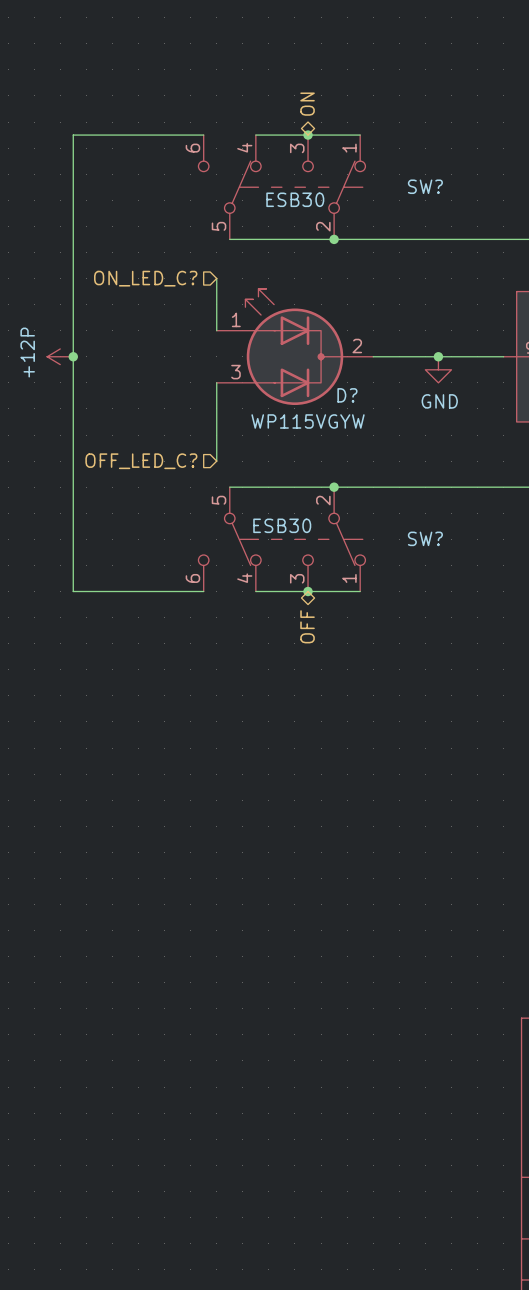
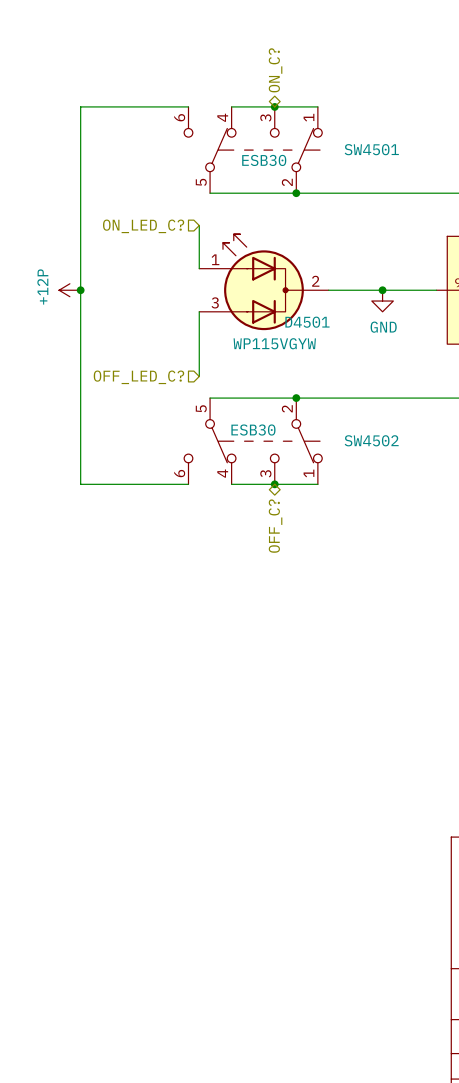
hierarchical label: ON (307, 104) -> ON_C? (275, 70)
SW? name: SW? (425, 186) -> SW4501 (371, 149)
D? name: D? (347, 395) -> D4501 (307, 322)
SW? name: SW? (425, 538) -> SW4502 (371, 440)
hierarchical label: OFF (307, 626) -> OFF_C? (275, 526)

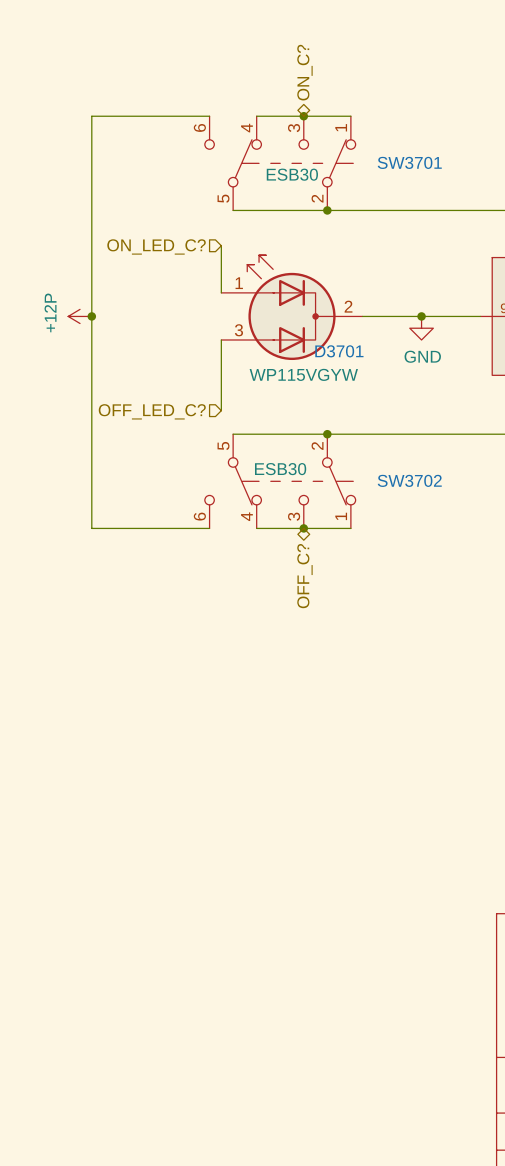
SW4501 name: SW4501 (371, 149) -> SW3701 (409, 162)
D4501 name: D4501 (307, 322) -> D3701 (339, 351)
SW4502 name: SW4502 (371, 440) -> SW3702 (409, 480)

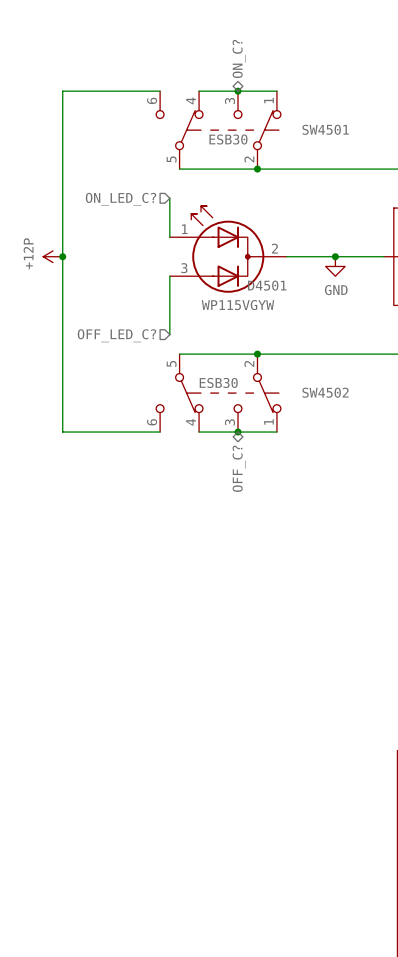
SW3701 name: SW3701 (409, 162) -> SW4501 (325, 129)
D3701 name: D3701 (339, 351) -> D4501 (267, 285)
SW3702 name: SW3702 (409, 480) -> SW4502 (325, 392)

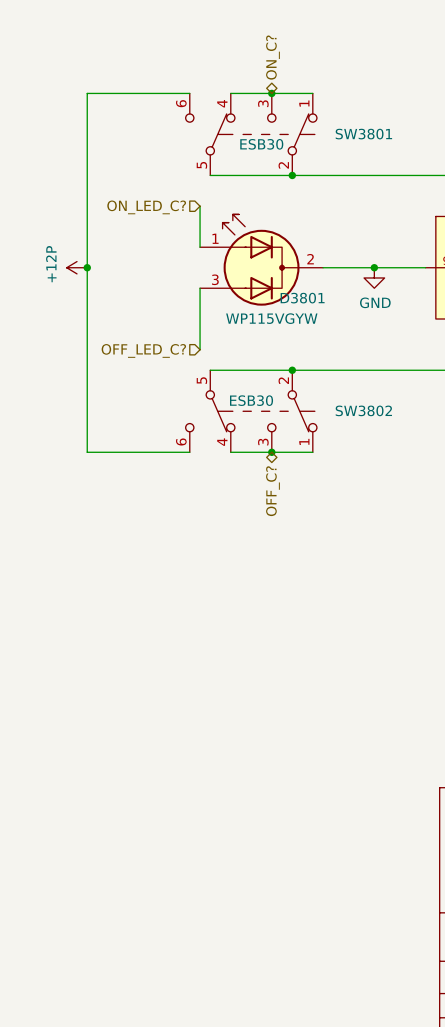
SW4501 name: SW4501 (325, 129) -> SW3801 (363, 134)
D4501 name: D4501 (267, 285) -> D3801 (302, 298)
SW4502 name: SW4502 (325, 392) -> SW3802 (363, 410)

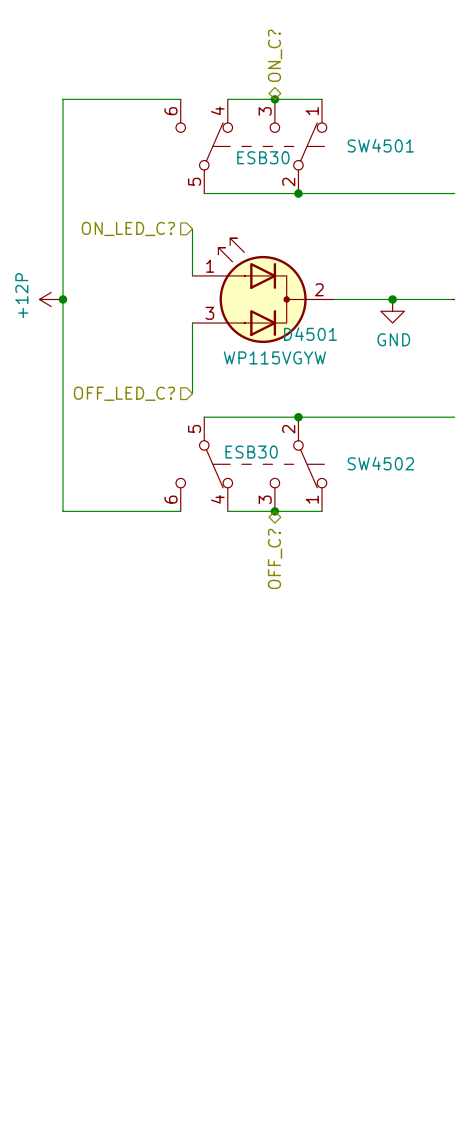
SW3801 name: SW3801 (363, 134) -> SW4501 (380, 145)
D3801 name: D3801 (302, 298) -> D4501 (310, 334)
SW3802 name: SW3802 (363, 410) -> SW4502 (380, 463)

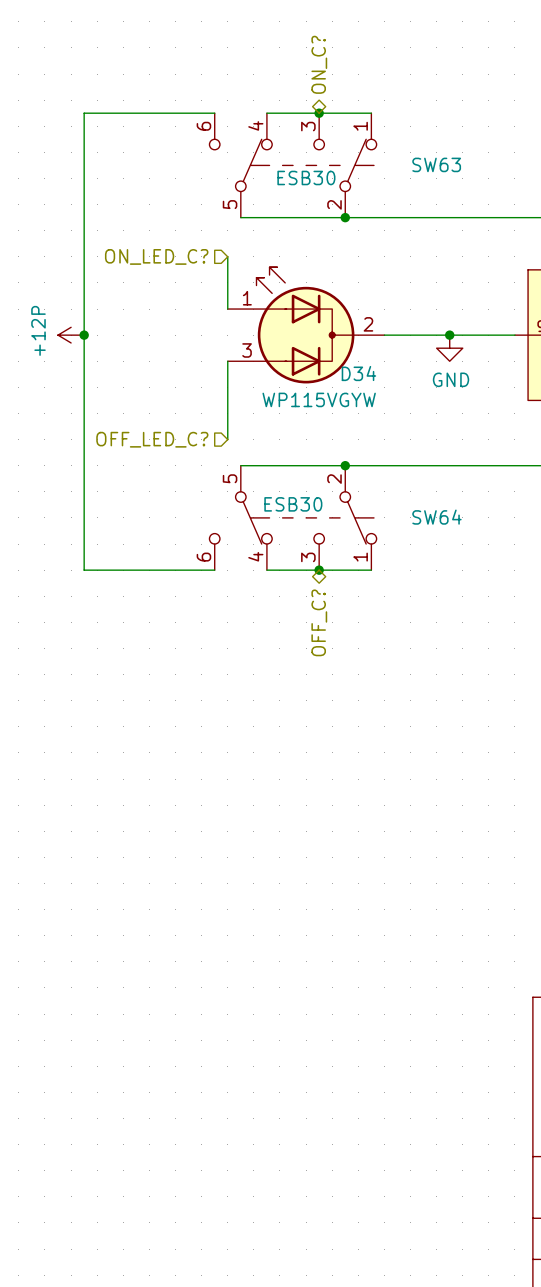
SW4501 name: SW4501 (380, 145) -> SW63 (436, 164)
D4501 name: D4501 (310, 334) -> D34 (358, 373)
SW4502 name: SW4502 (380, 463) -> SW64 (436, 517)

